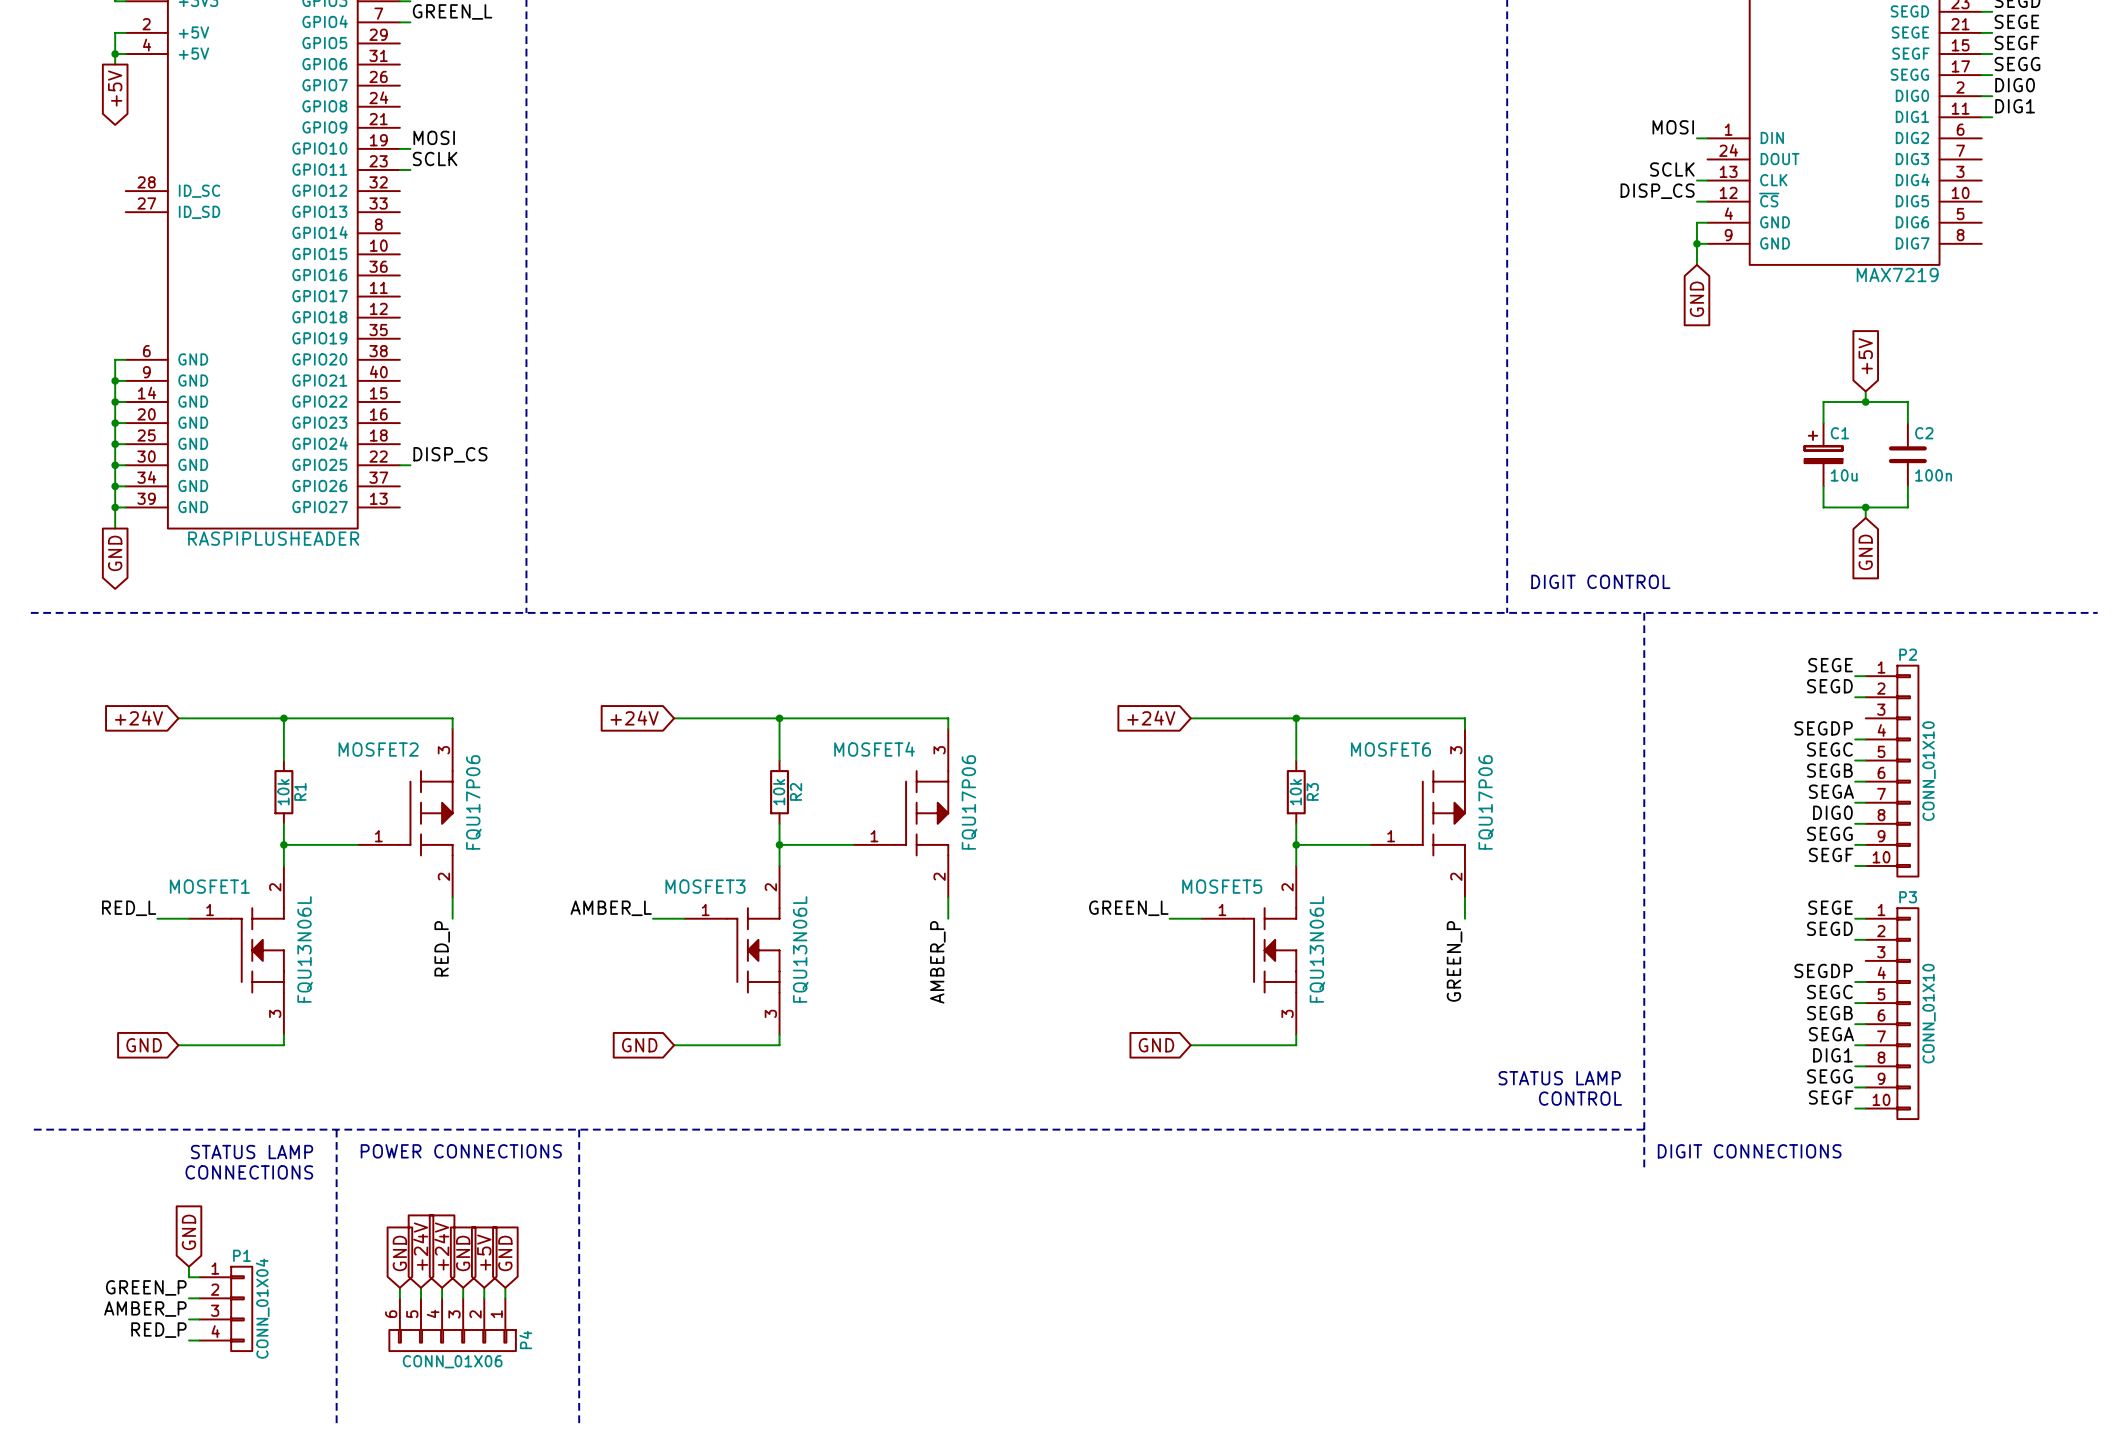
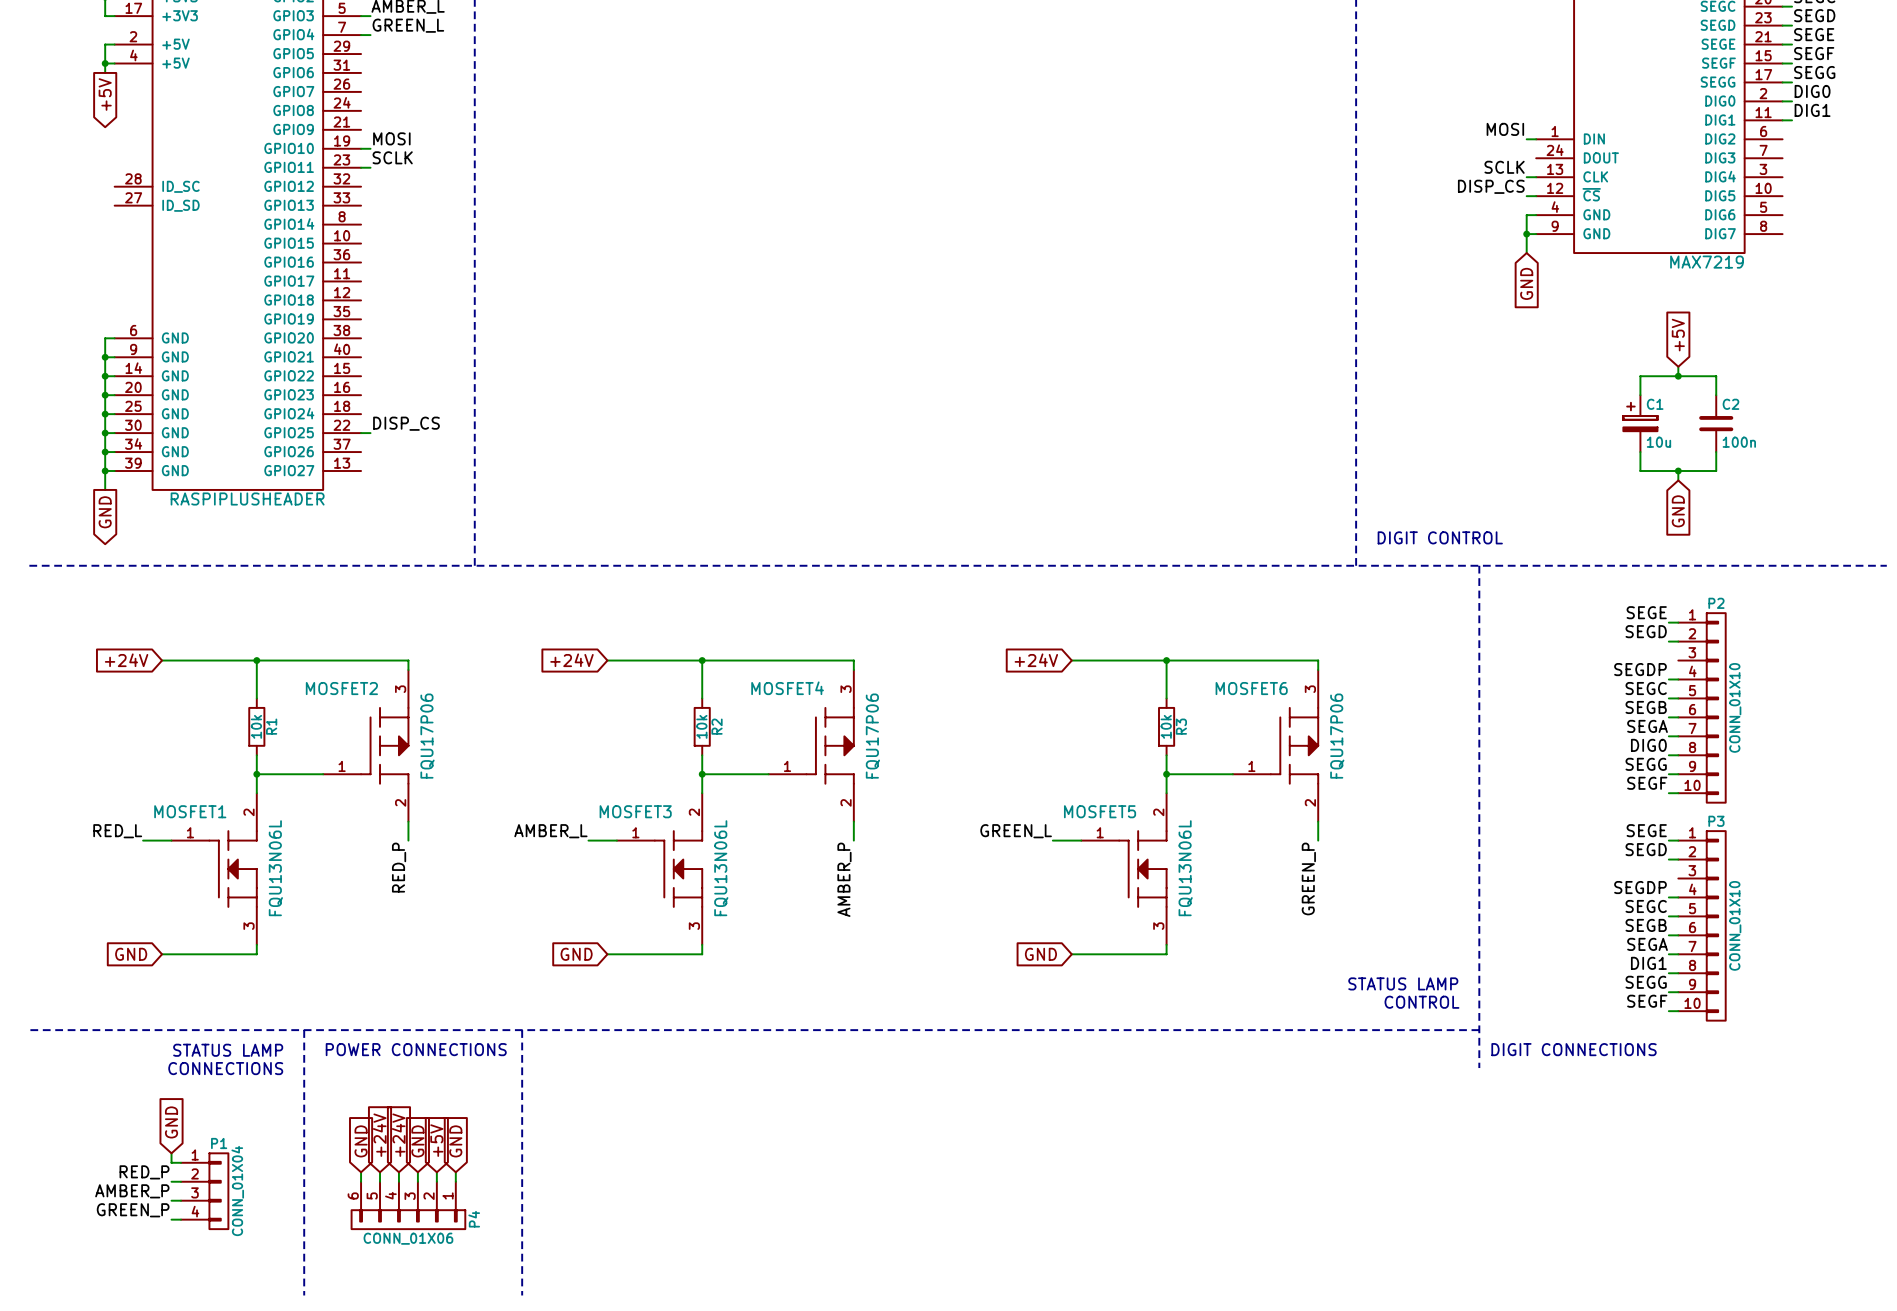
label: GREEN_P (146, 1287) -> RED_P (144, 1172)
label: RED_P (158, 1330) -> GREEN_P (133, 1210)

